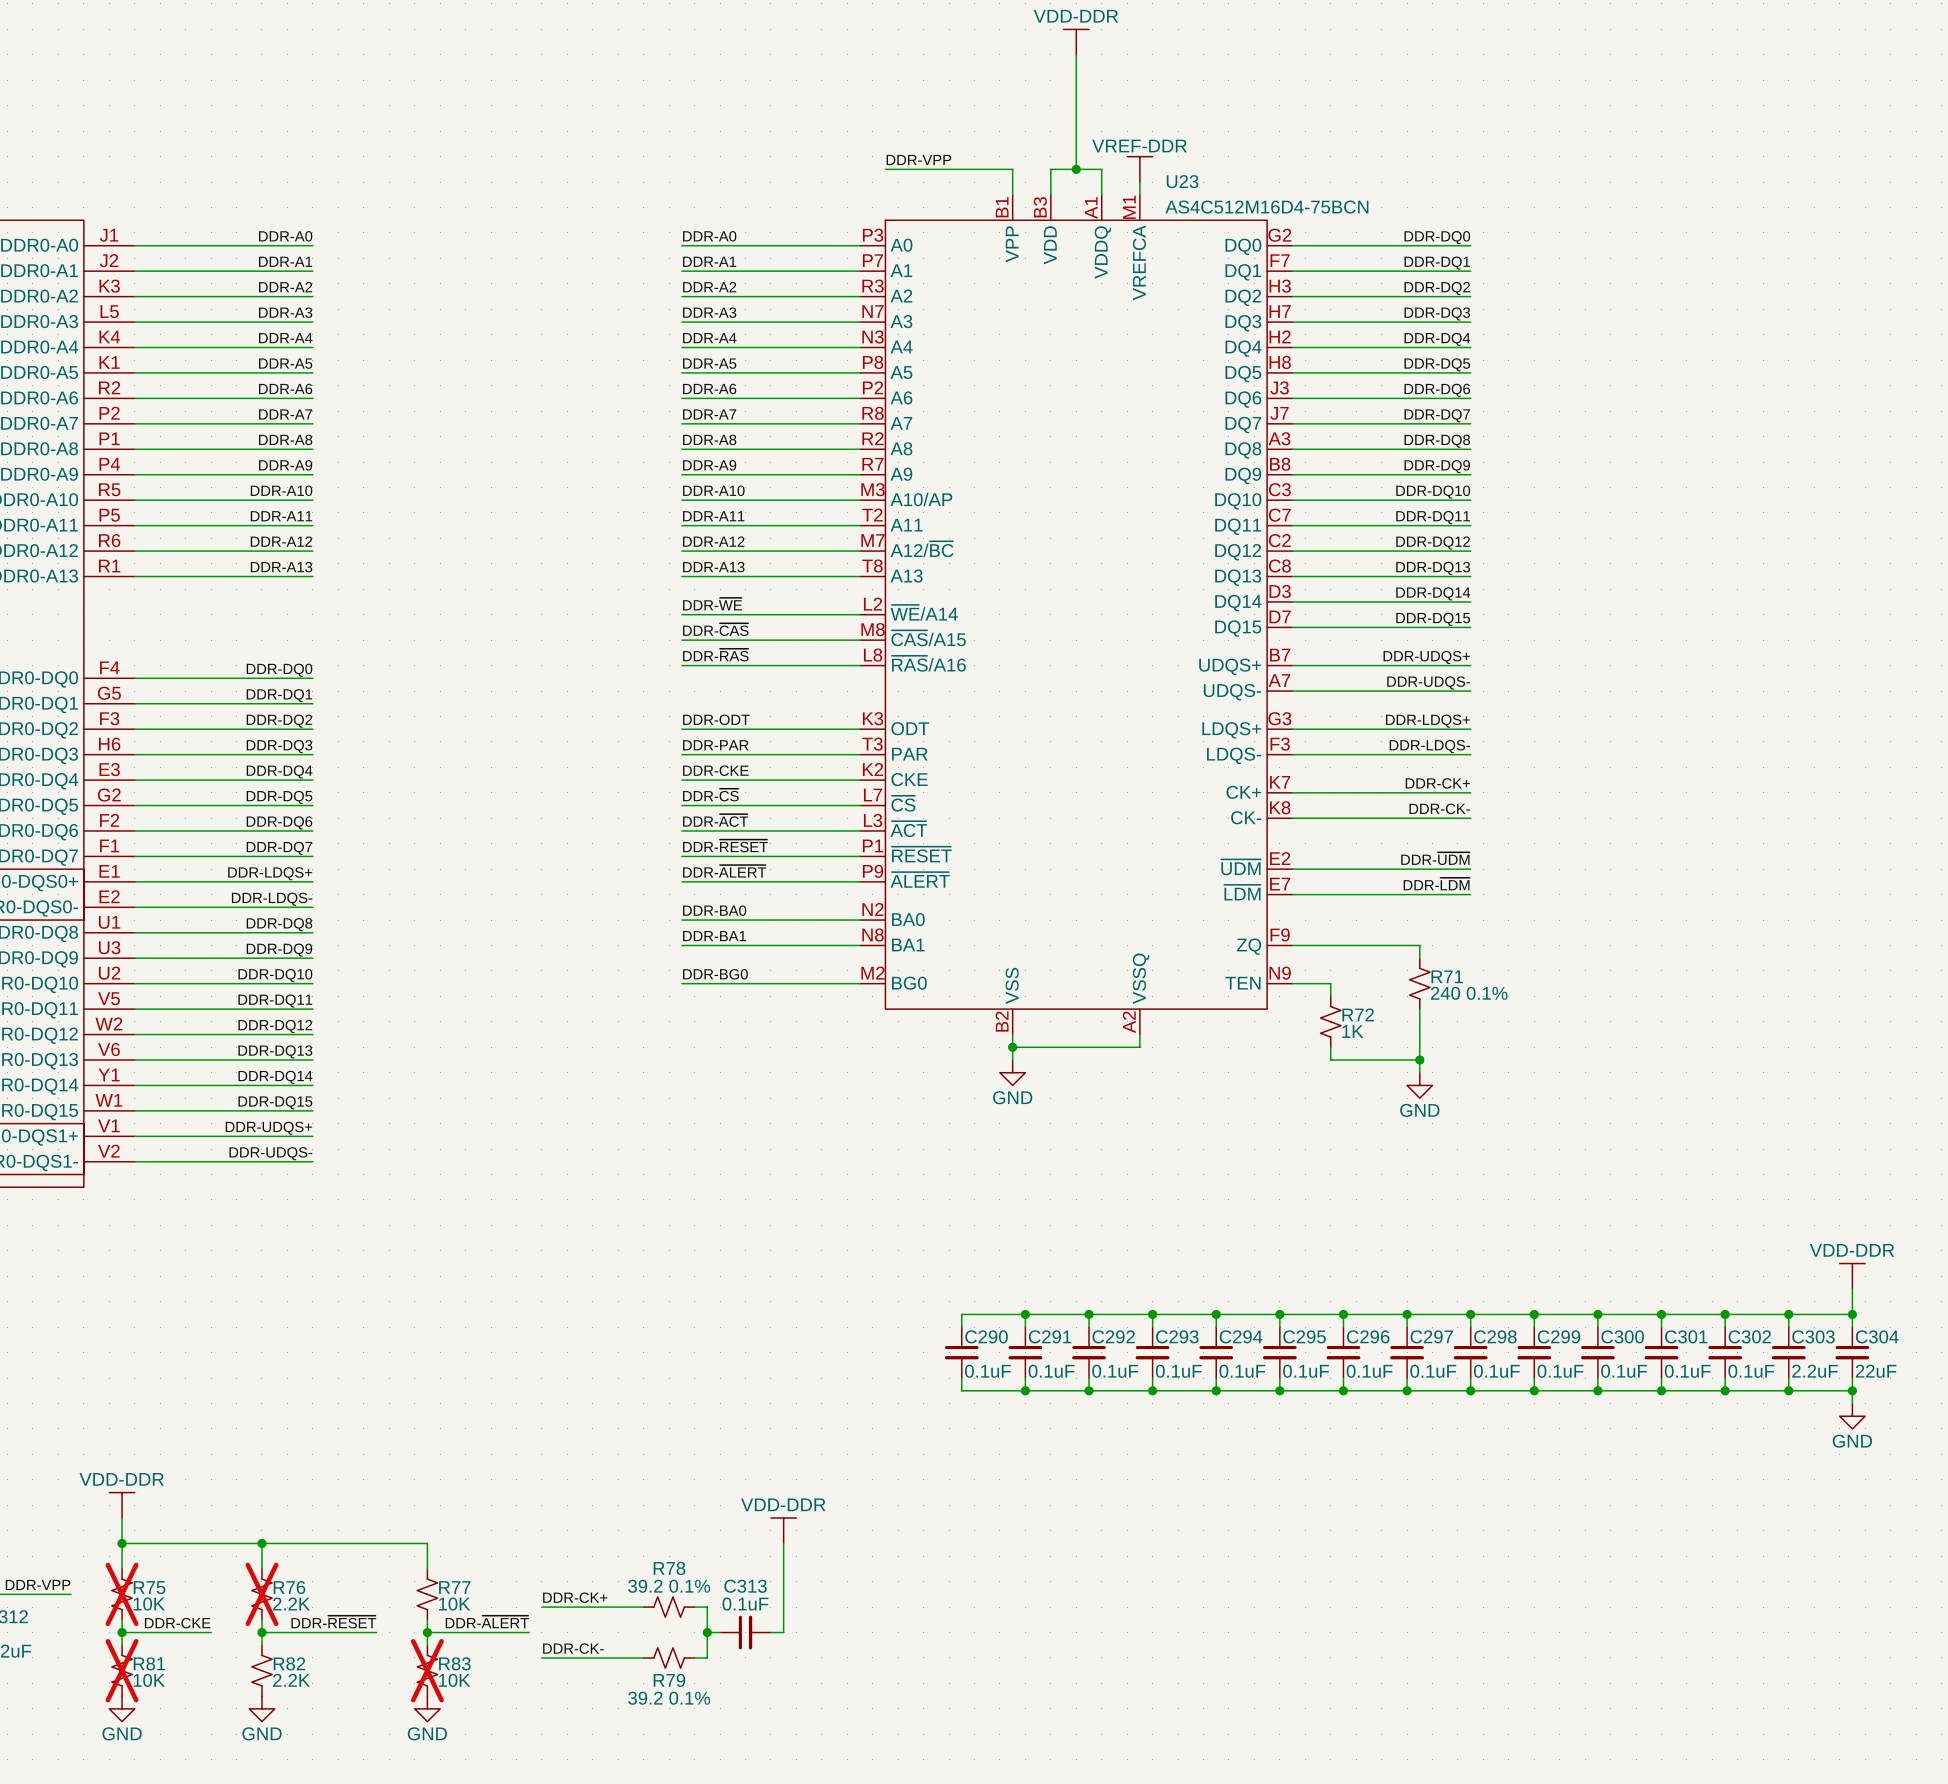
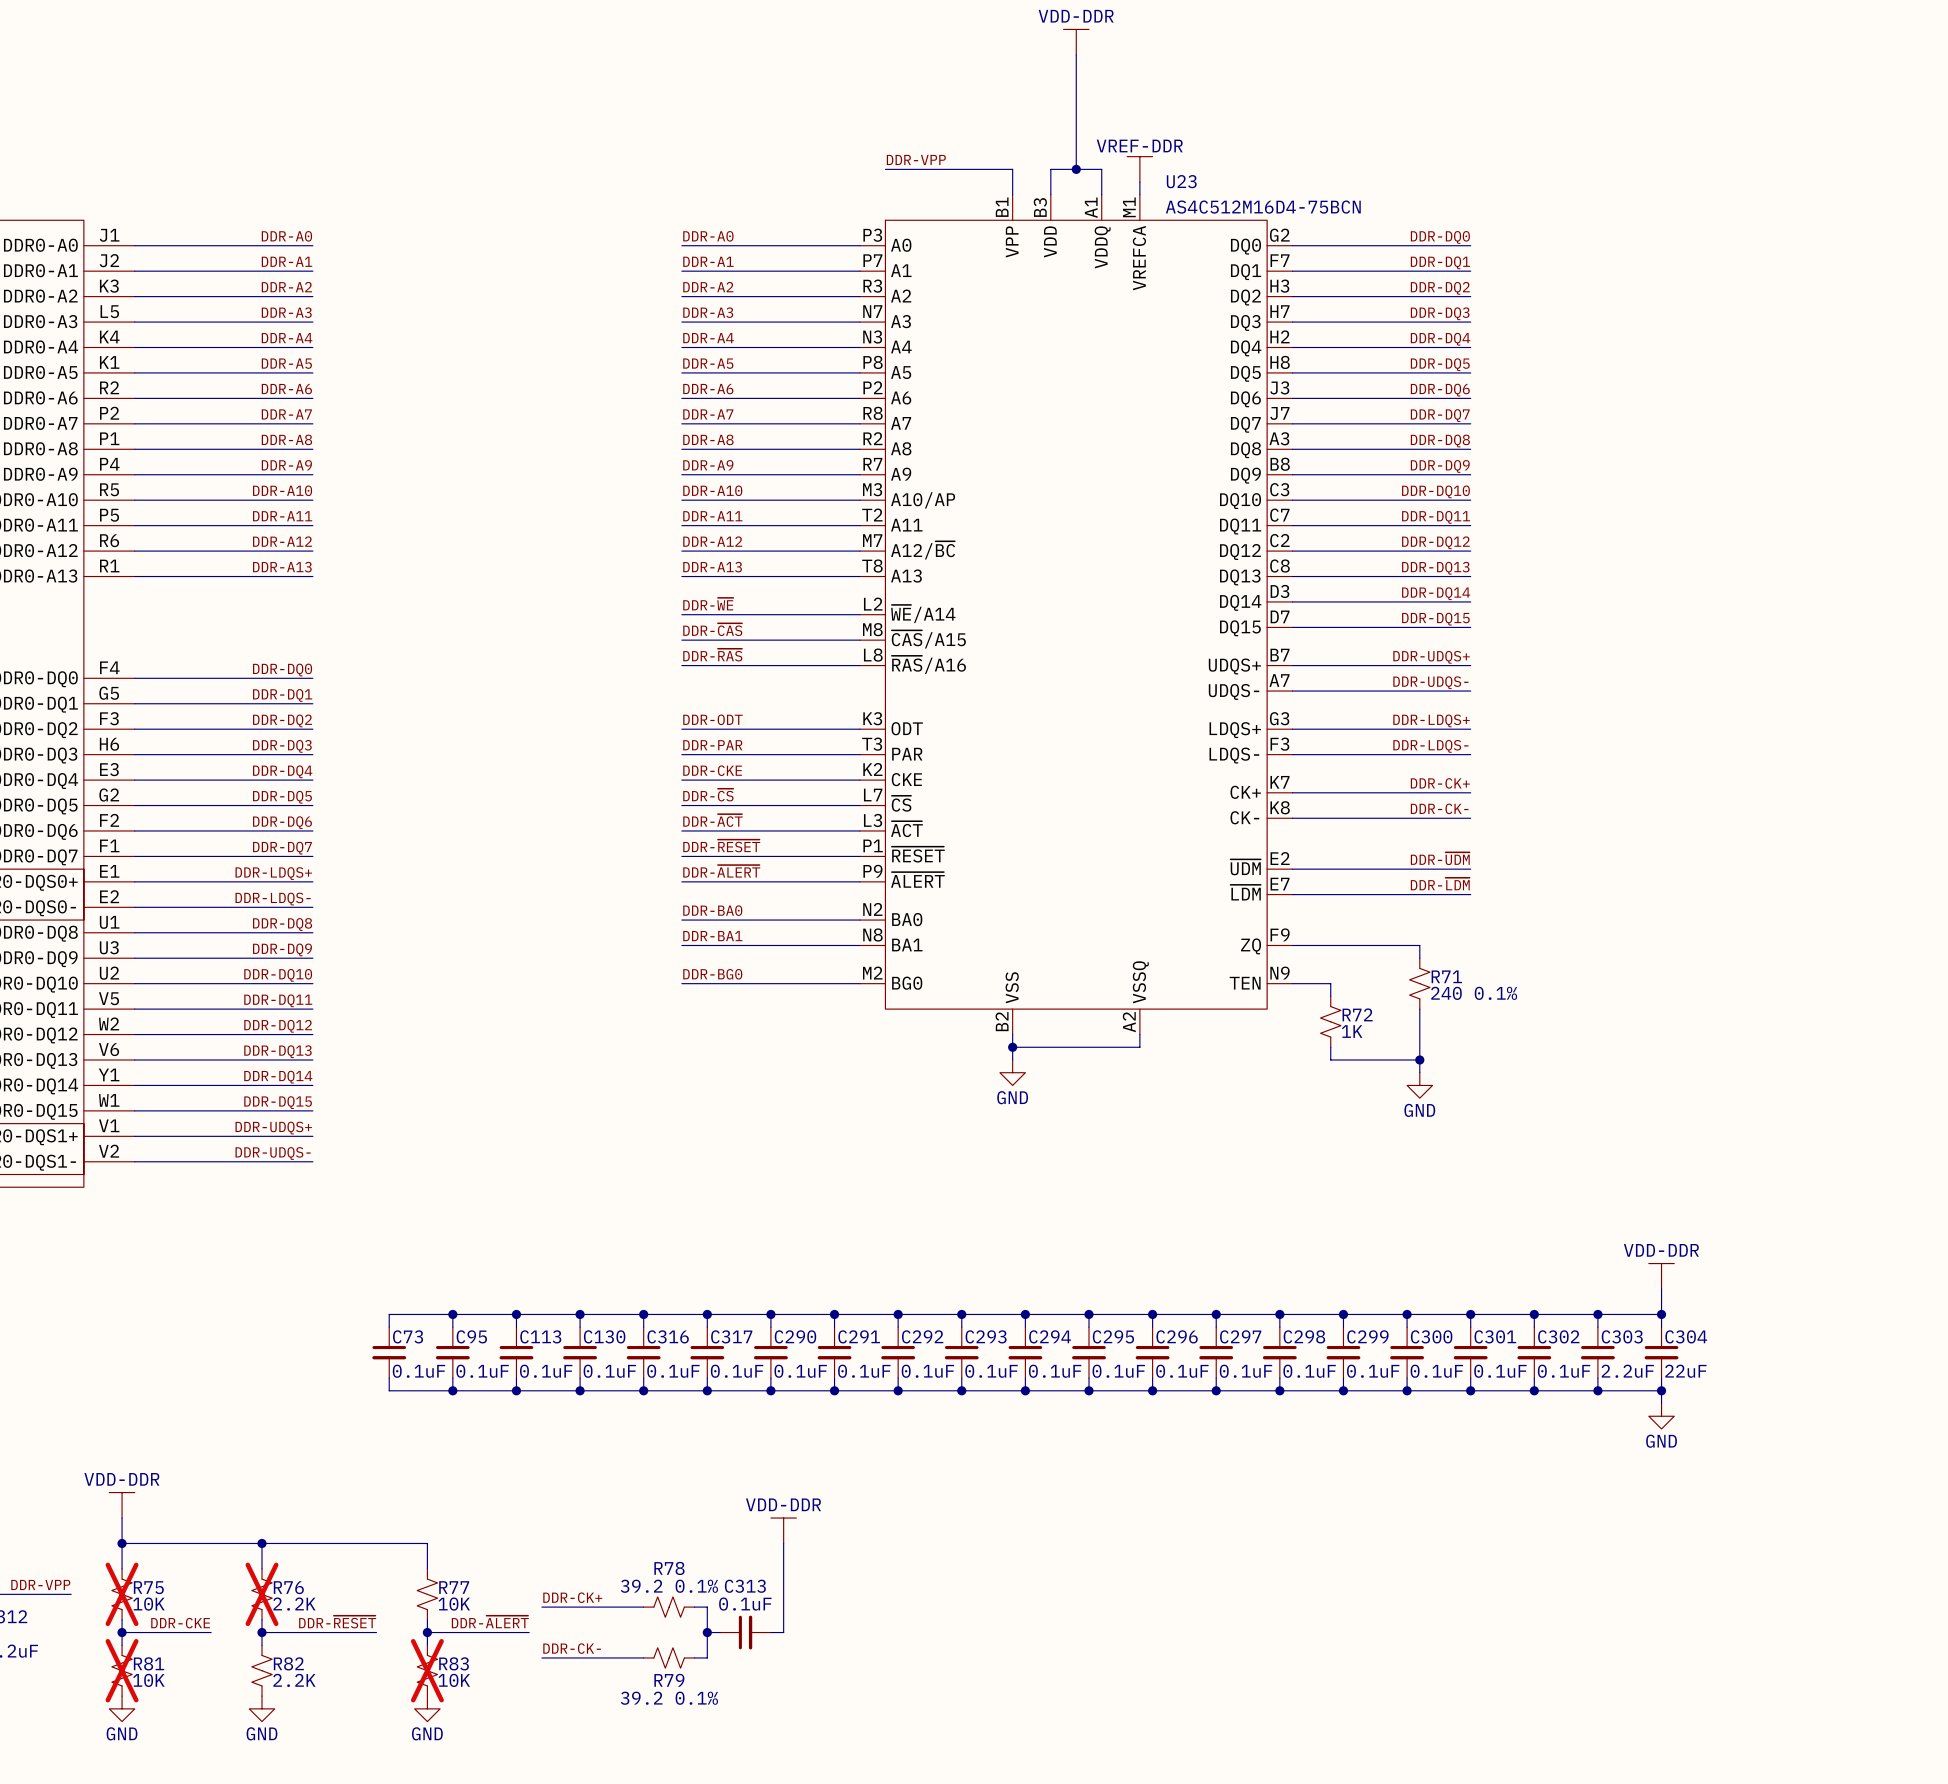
power symbol position: VDD-DDR (1852, 1276) -> VDD-DDR (1661, 1276)
wire: (1852, 1289) (1852, 1327) -> none
wire: none -> (452, 1314) (452, 1327)
junction: none -> (452, 1314)
wire: none -> (516, 1314) (516, 1327)
junction: none -> (516, 1314)
wire: none -> (580, 1314) (580, 1327)
junction: none -> (580, 1314)
wire: none -> (643, 1314) (643, 1327)
junction: none -> (643, 1314)
wire: none -> (707, 1314) (707, 1327)
junction: none -> (707, 1314)
wire: none -> (770, 1314) (770, 1327)
junction: none -> (770, 1314)
wire: none -> (834, 1314) (834, 1327)
junction: none -> (834, 1314)
wire: none -> (898, 1314) (898, 1327)
junction: none -> (898, 1314)
wire: none -> (961, 1314) (389, 1314) (389, 1327)
junction: none -> (961, 1314)
wire: (1661, 1314) (1852, 1314) -> (1661, 1314) (1661, 1289)
wire: (1725, 1314) (1725, 1327) -> none
junction: (1725, 1314) -> none
wire: (1788, 1314) (1788, 1327) -> none
junction: (1788, 1314) -> none
junction: (1852, 1314) -> none
C290 name: C290 (986, 1336) -> C293 (986, 1336)
C291 name: C291 (1050, 1336) -> C294 (1050, 1336)
C292 name: C292 (1113, 1336) -> C295 (1113, 1336)
C293 name: C293 (1177, 1336) -> C296 (1177, 1336)
C294 name: C294 (1241, 1336) -> C297 (1240, 1336)
C295 name: C295 (1304, 1336) -> C298 (1304, 1336)
C296 name: C296 (1368, 1336) -> C299 (1367, 1336)
C297 name: C297 (1431, 1336) -> C300 (1431, 1336)
C298 name: C298 (1495, 1336) -> C301 (1495, 1336)
C299 name: C299 (1558, 1336) -> C302 (1558, 1336)
C300 name: C300 (1622, 1336) -> C303 (1622, 1336)
C301 name: C301 (1686, 1336) -> C304 (1686, 1336)
C73: none -> 0.1uF (389, 1352)
C95: none -> 0.1uF (452, 1352)
C113: none -> 0.1uF (516, 1352)
C130: none -> 0.1uF (580, 1352)
C316: none -> 0.1uF (643, 1352)
C317: none -> 0.1uF (707, 1352)
C290: none -> 0.1uF (770, 1352)
C291: none -> 0.1uF (834, 1352)
C292: none -> 0.1uF (898, 1352)
C302: 0.1uF (1725, 1352) -> none
C303: 2.2uF (1788, 1352) -> none
C304: 22uF (1852, 1352) -> none
C300 value: 0.1uF (1624, 1371) -> 2.2uF (1627, 1371)
C301 value: 0.1uF (1687, 1371) -> 22uF (1685, 1371)
wire: none -> (389, 1378) (389, 1390) (961, 1390)
wire: none -> (452, 1378) (452, 1390)
wire: none -> (516, 1378) (516, 1390)
wire: none -> (580, 1378) (580, 1390)
wire: none -> (643, 1378) (643, 1390)
wire: none -> (707, 1378) (707, 1390)
wire: none -> (770, 1378) (770, 1390)
wire: none -> (834, 1378) (834, 1390)
wire: none -> (898, 1378) (898, 1390)
wire: (1725, 1378) (1725, 1390) -> none
wire: (1788, 1378) (1788, 1390) -> none
wire: (1852, 1378) (1852, 1403) -> none
junction: none -> (452, 1390)
junction: none -> (516, 1390)
junction: none -> (580, 1390)
junction: none -> (643, 1390)
junction: none -> (707, 1390)
junction: none -> (770, 1390)
junction: none -> (834, 1390)
junction: none -> (898, 1390)
junction: none -> (961, 1390)
wire: (1661, 1390) (1852, 1390) -> (1661, 1390) (1661, 1403)
junction: (1725, 1390) -> none
junction: (1788, 1390) -> none
junction: (1852, 1390) -> none
power symbol position: GND (1852, 1416) -> GND (1661, 1416)

